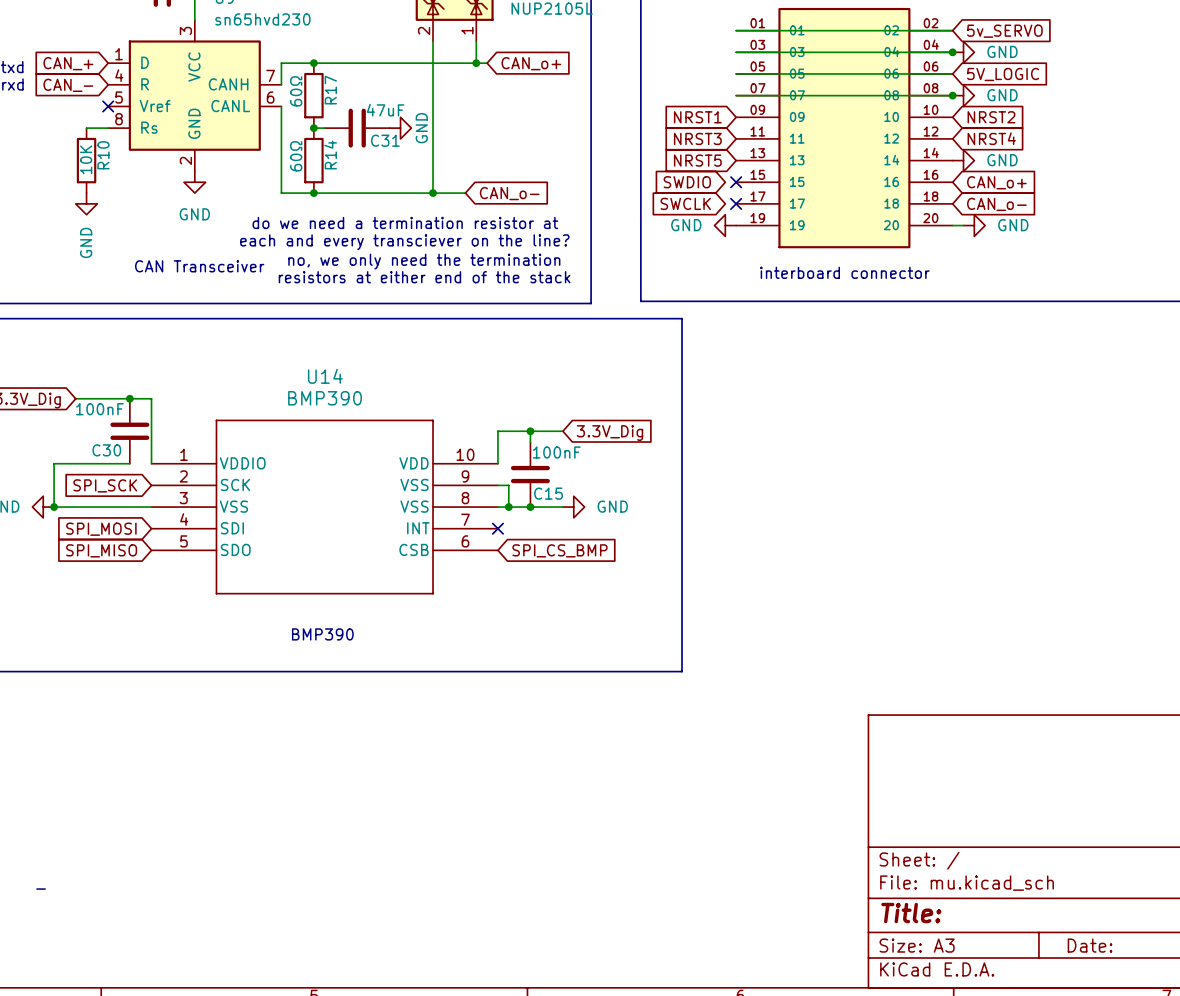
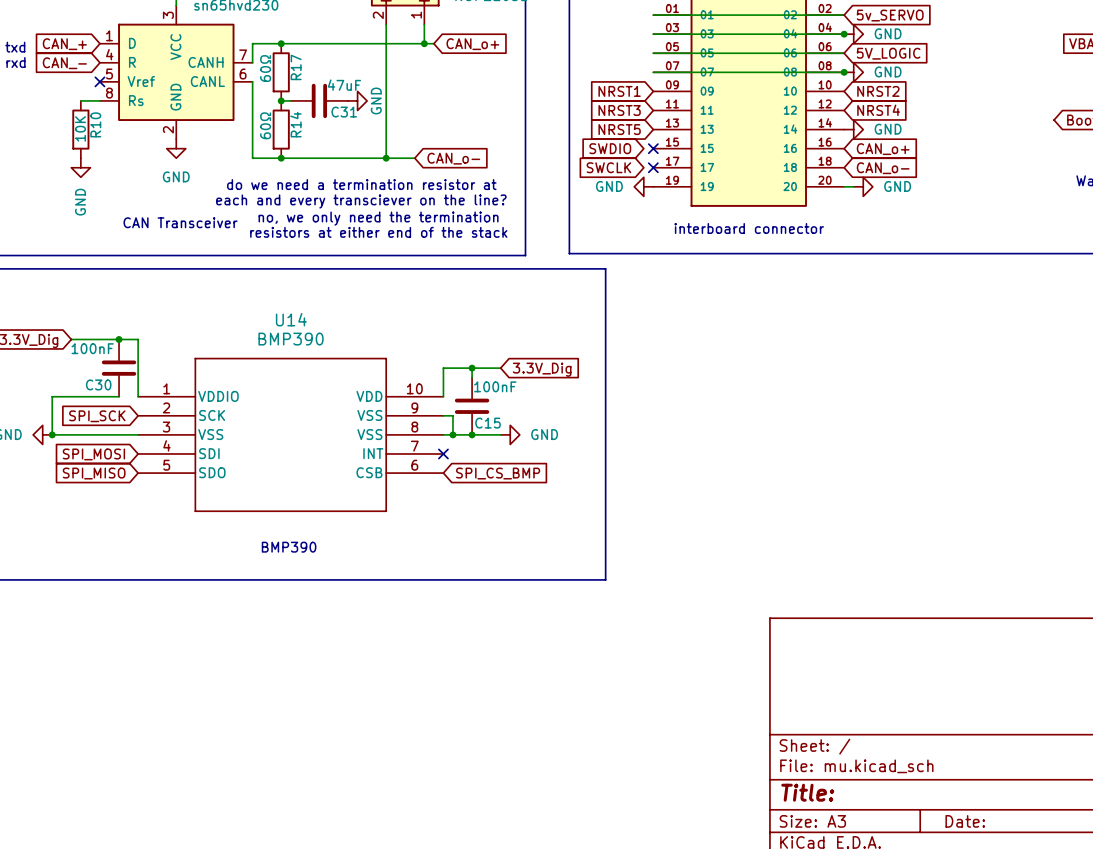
text: - (41, 889) -> none

